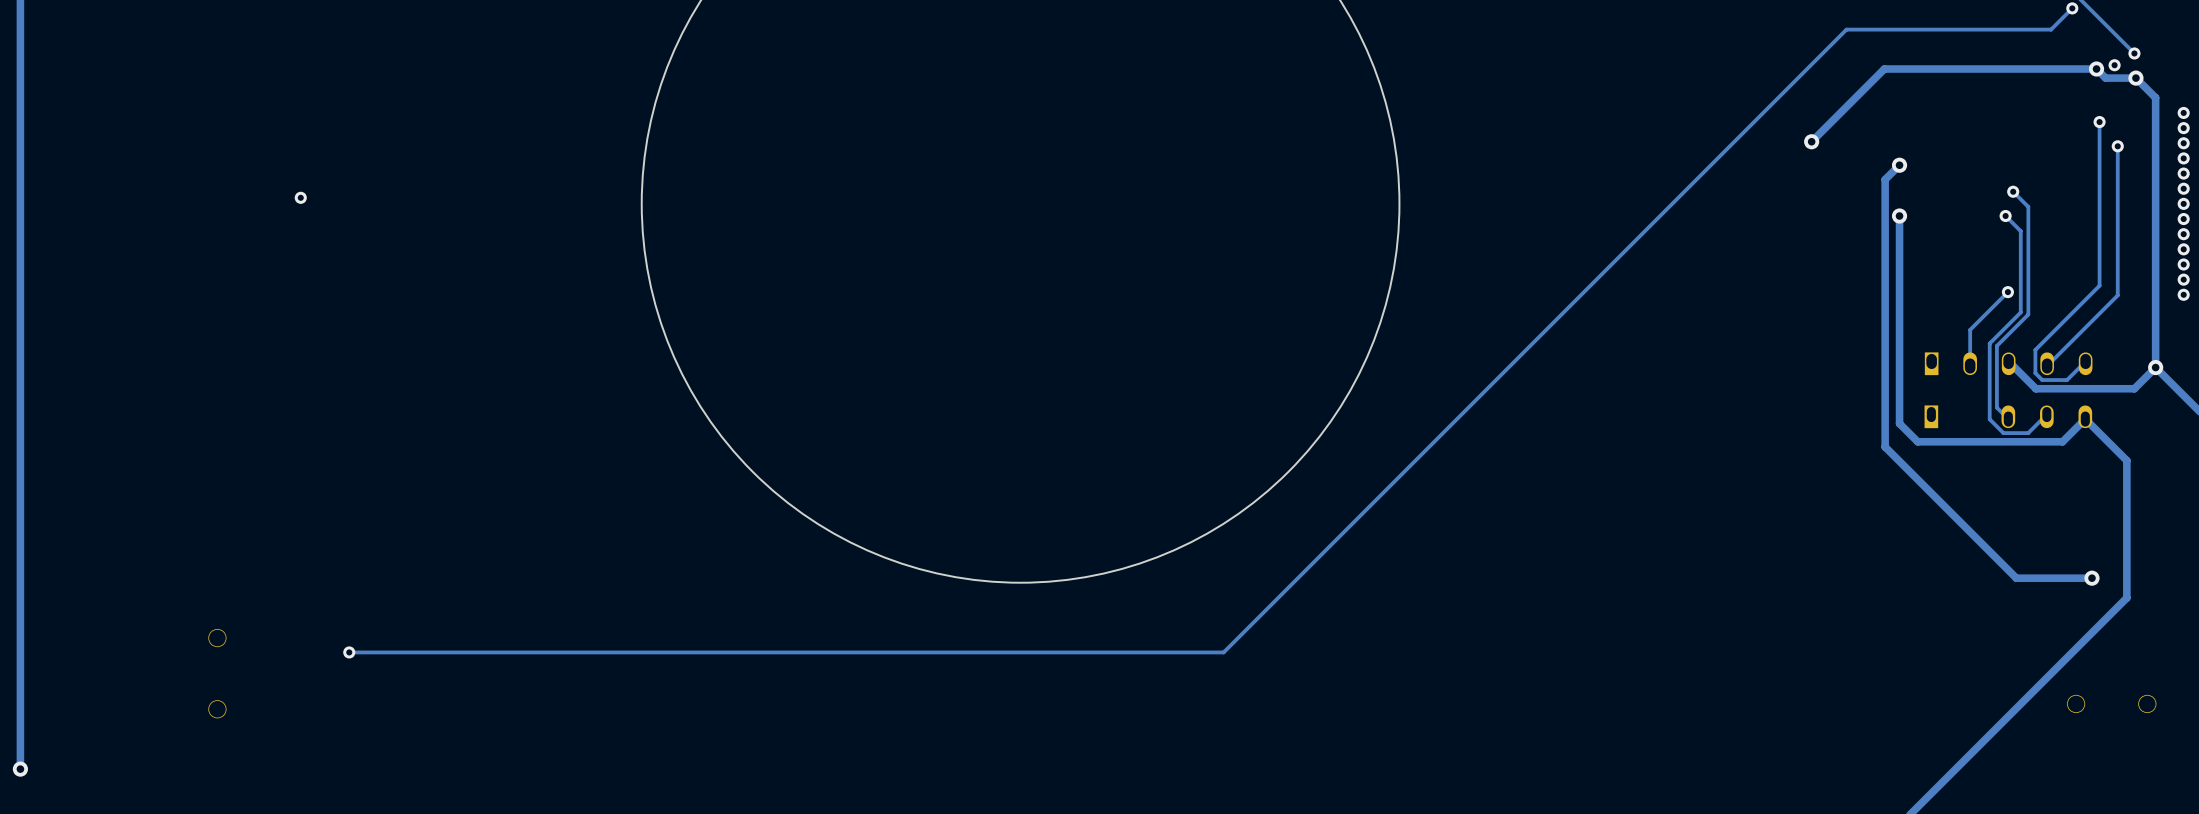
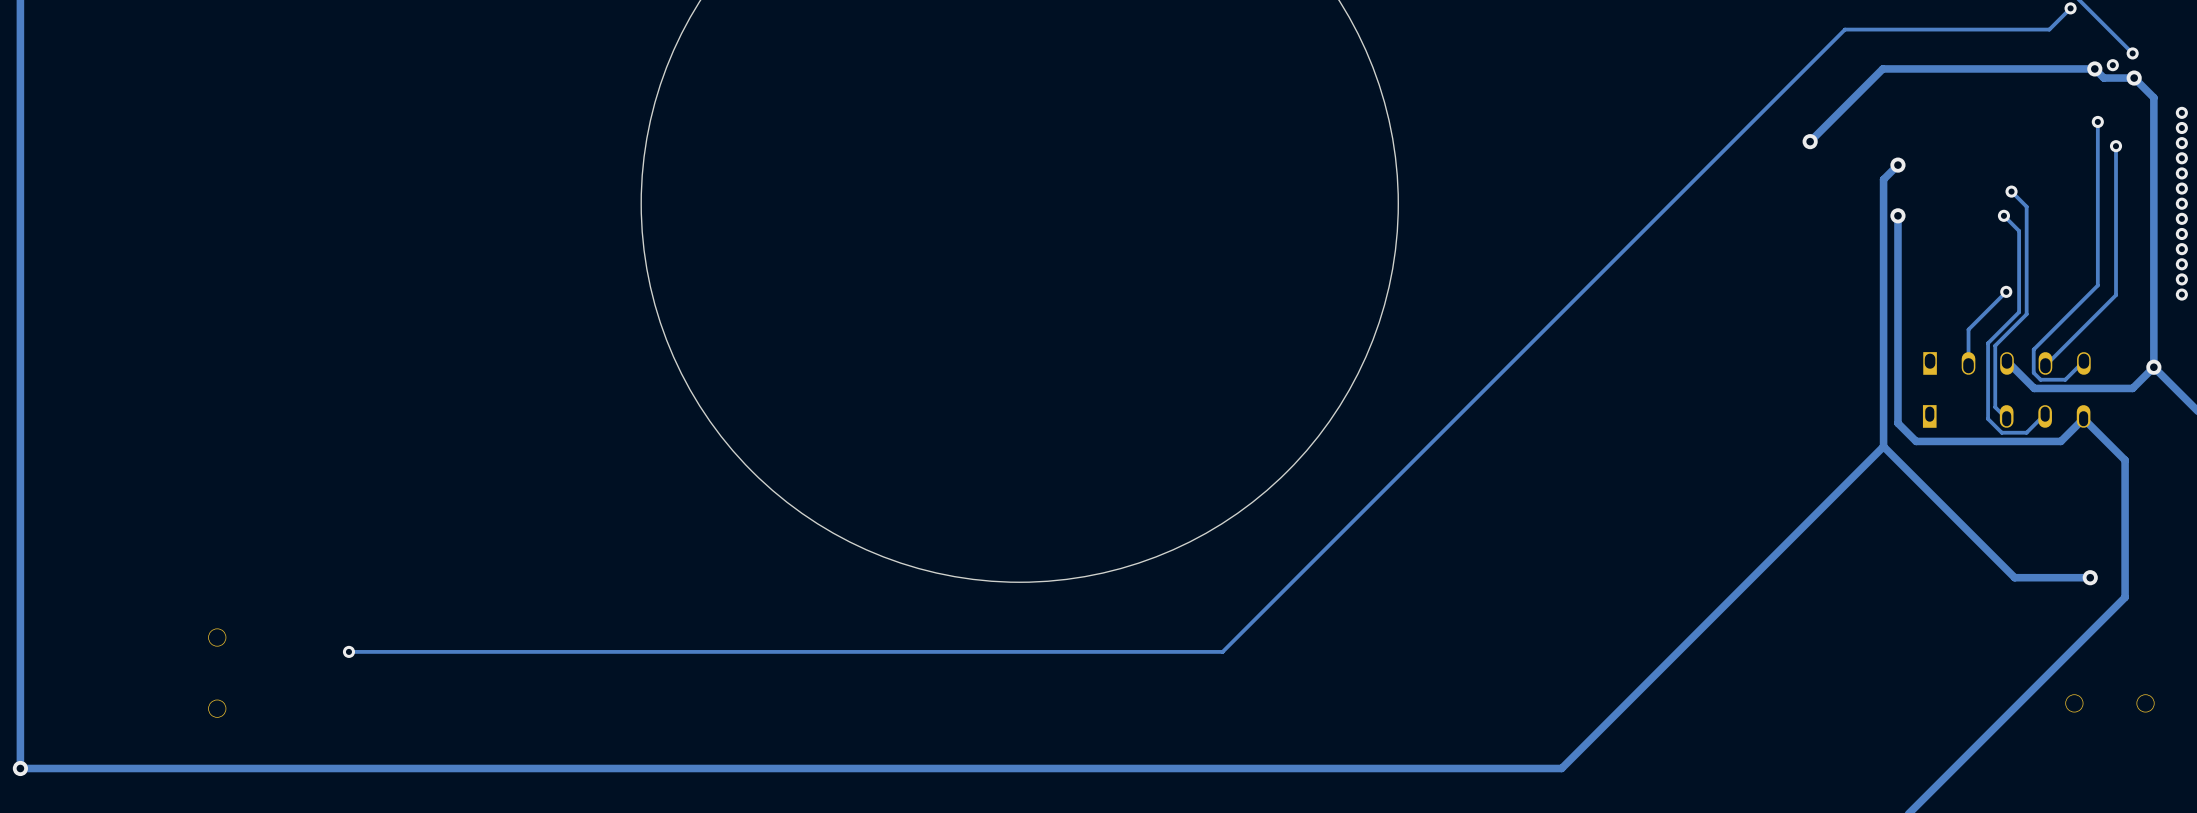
via: (300, 197) -> none
track: none -> (1883, 446) (1561, 768) (20, 768)

